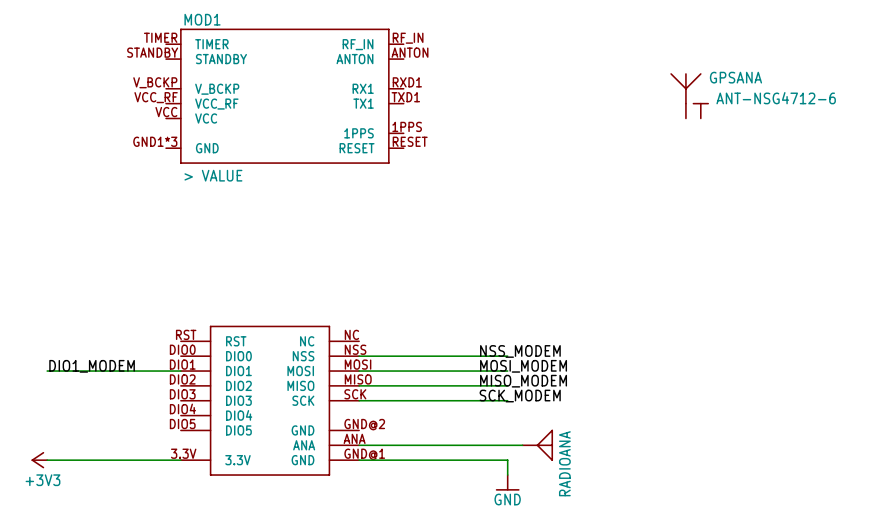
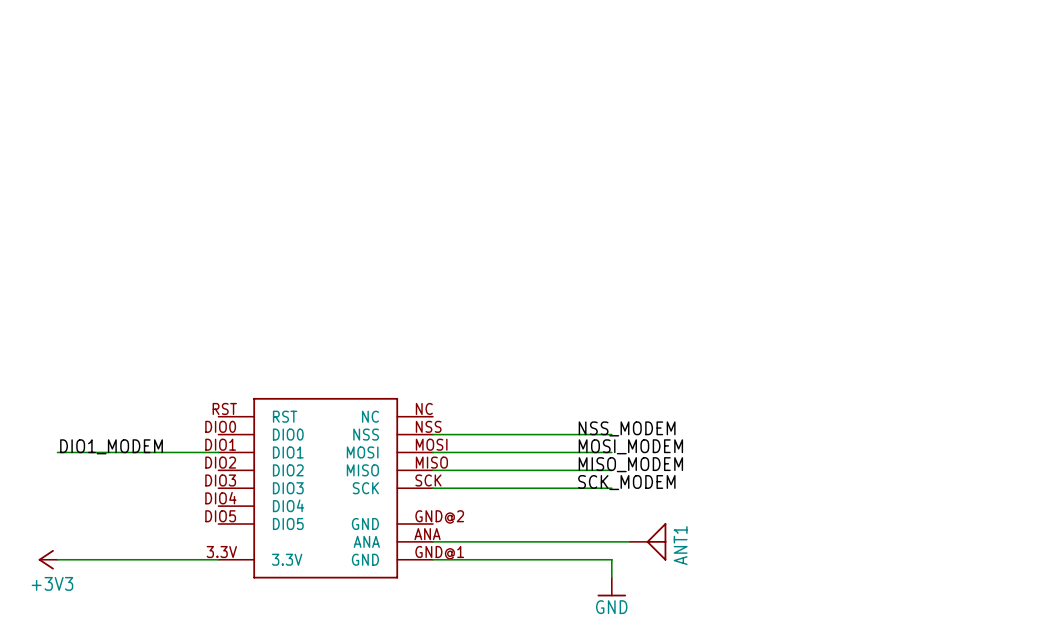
GPSANA: ANT-NSG4712-6 (689, 95) -> none
MOD1: (284, 96) -> none
RADIOANA name: RADIOANA (564, 463) -> ANT1 (680, 545)

